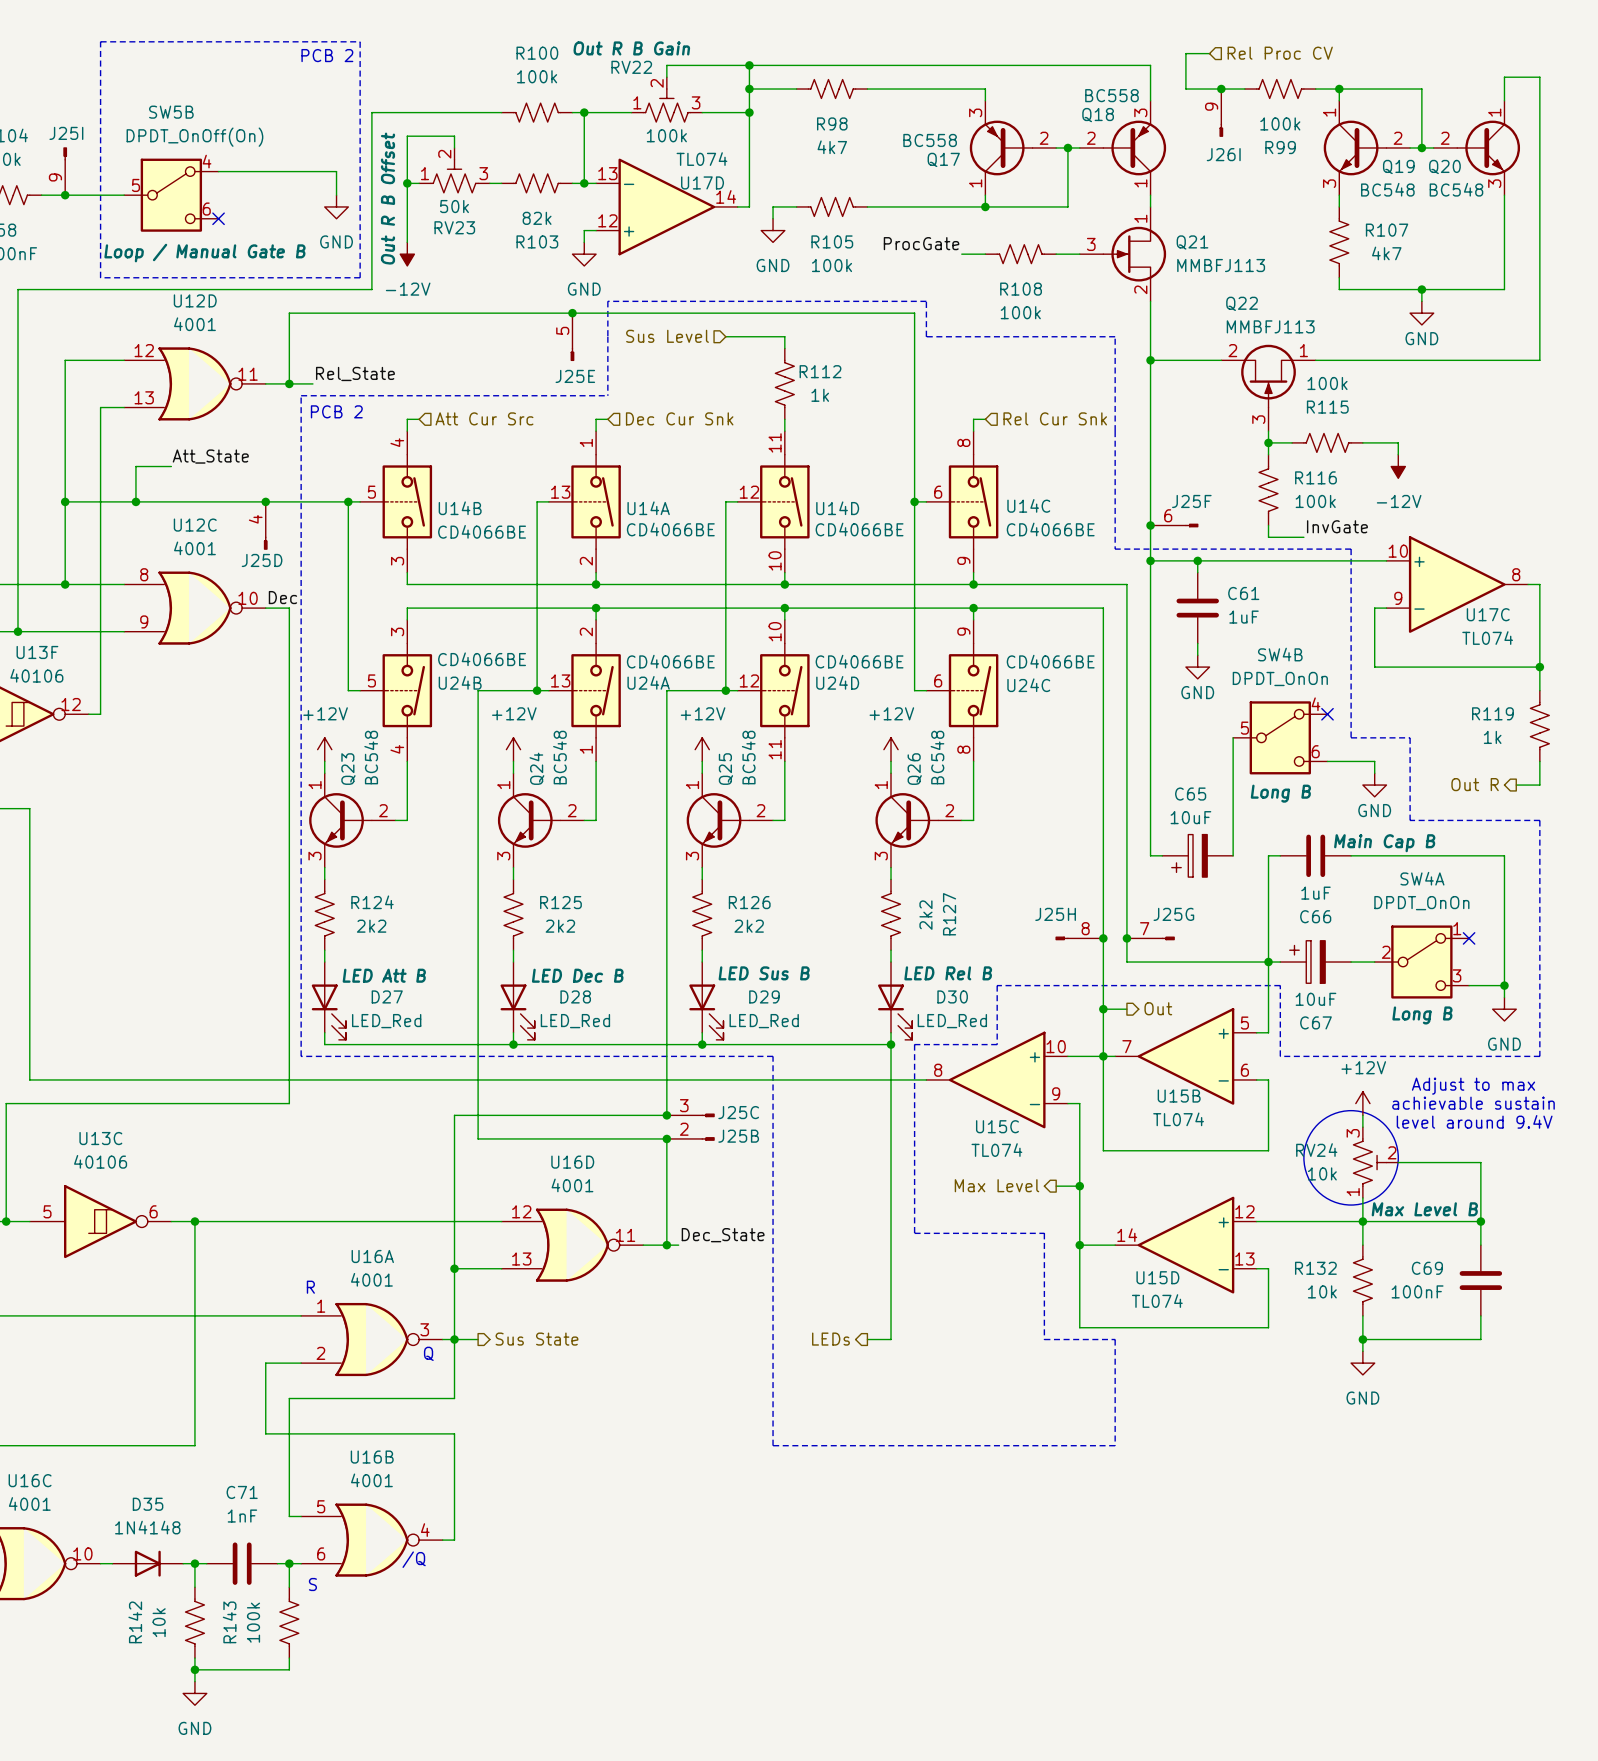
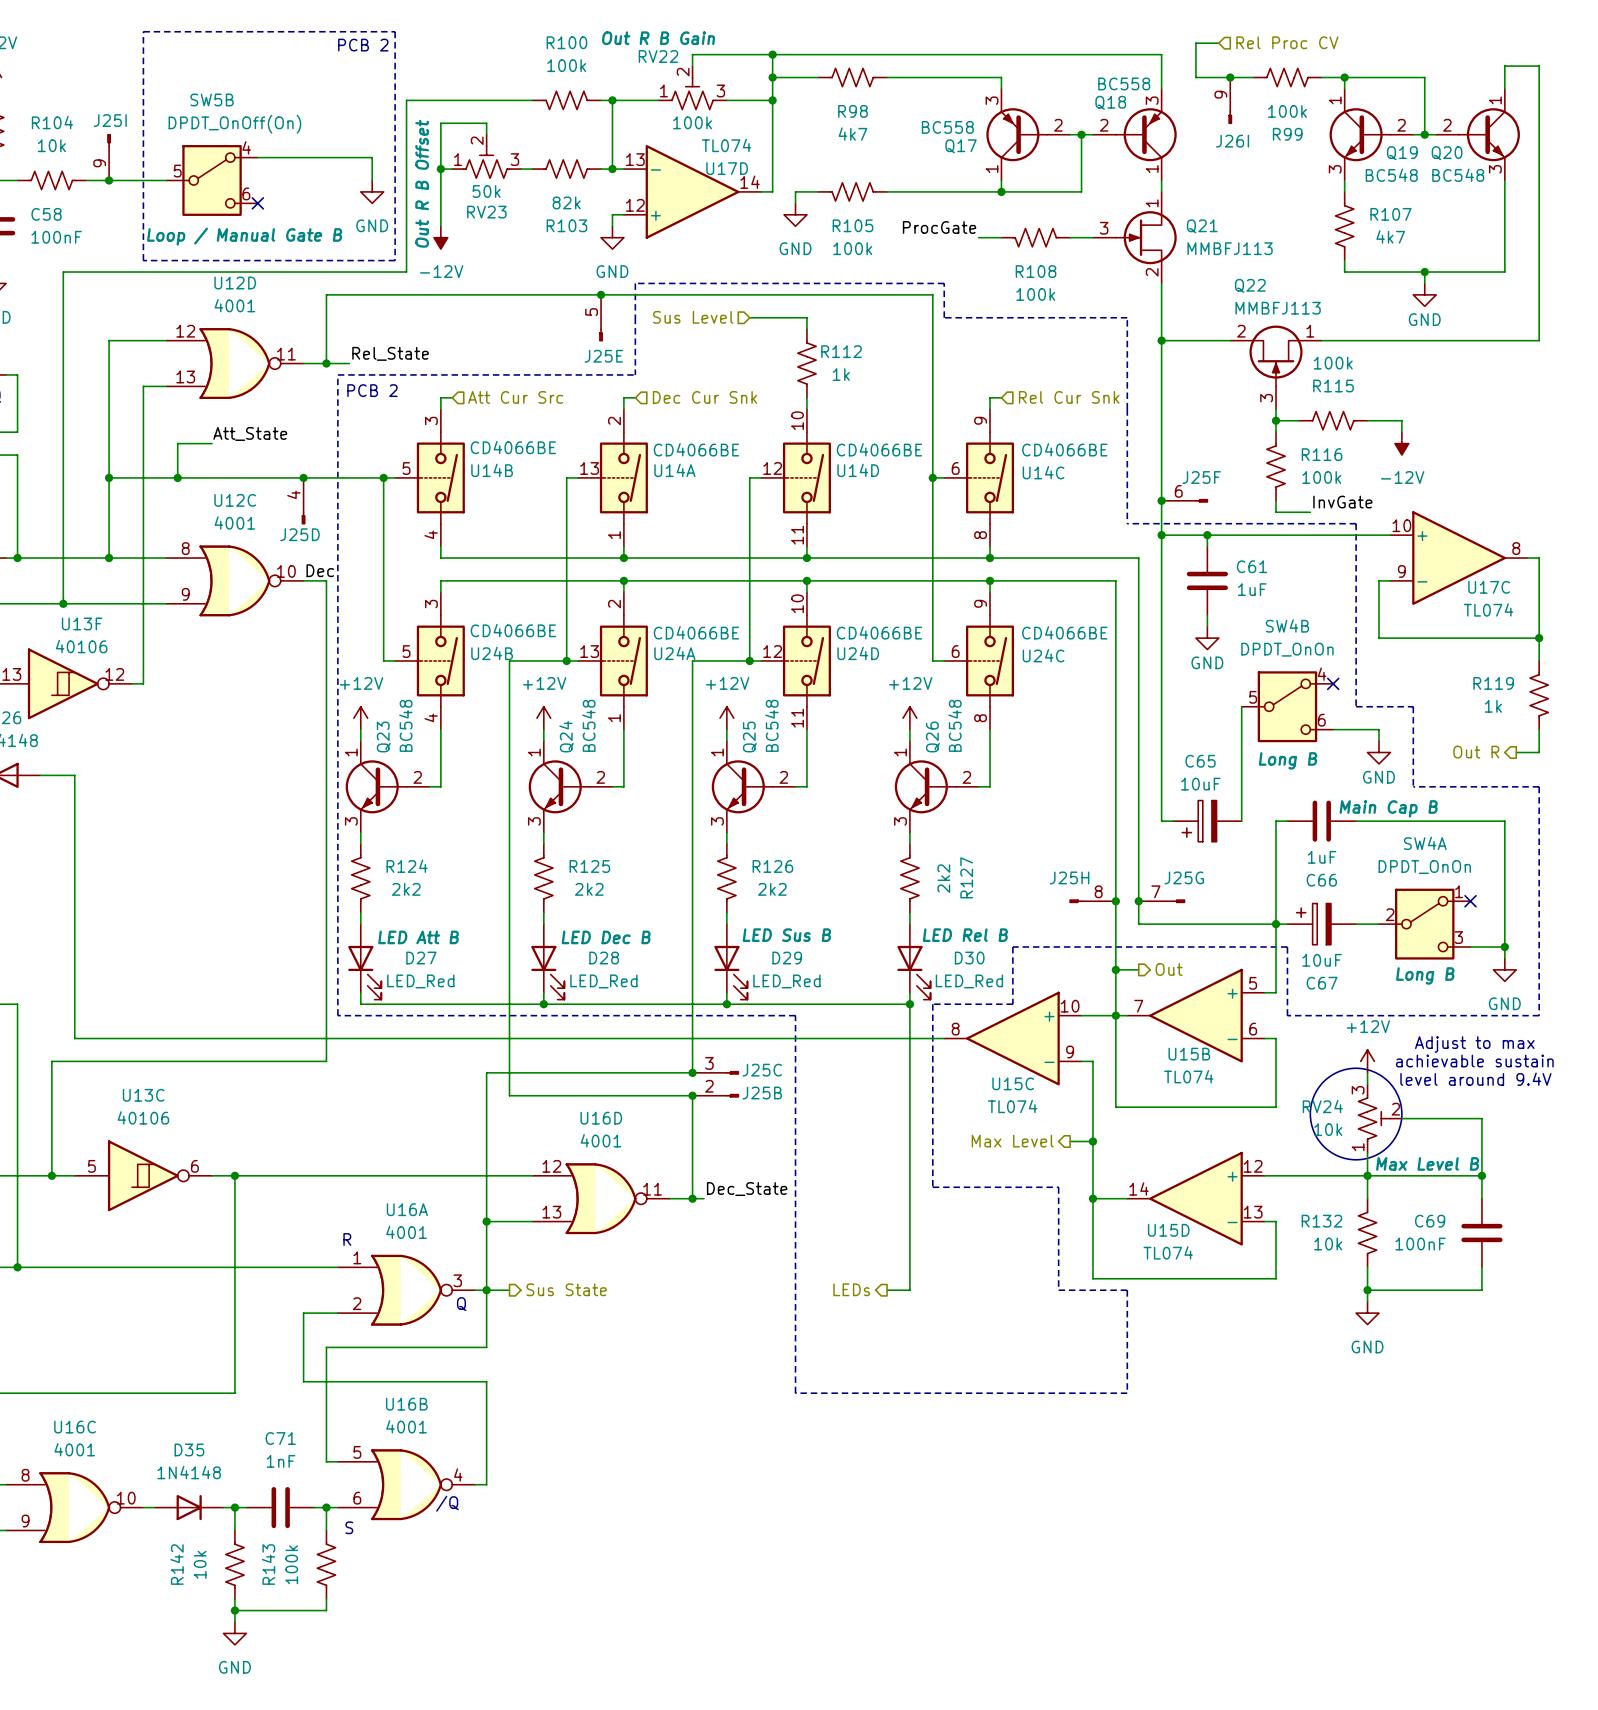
U14B flip: as is (407, 501) -> up-down (440, 477)
U14A flip: as is (596, 501) -> up-down (623, 477)
U14D flip: as is (784, 501) -> up-down (806, 477)
U14C flip: as is (973, 501) -> up-down (990, 477)

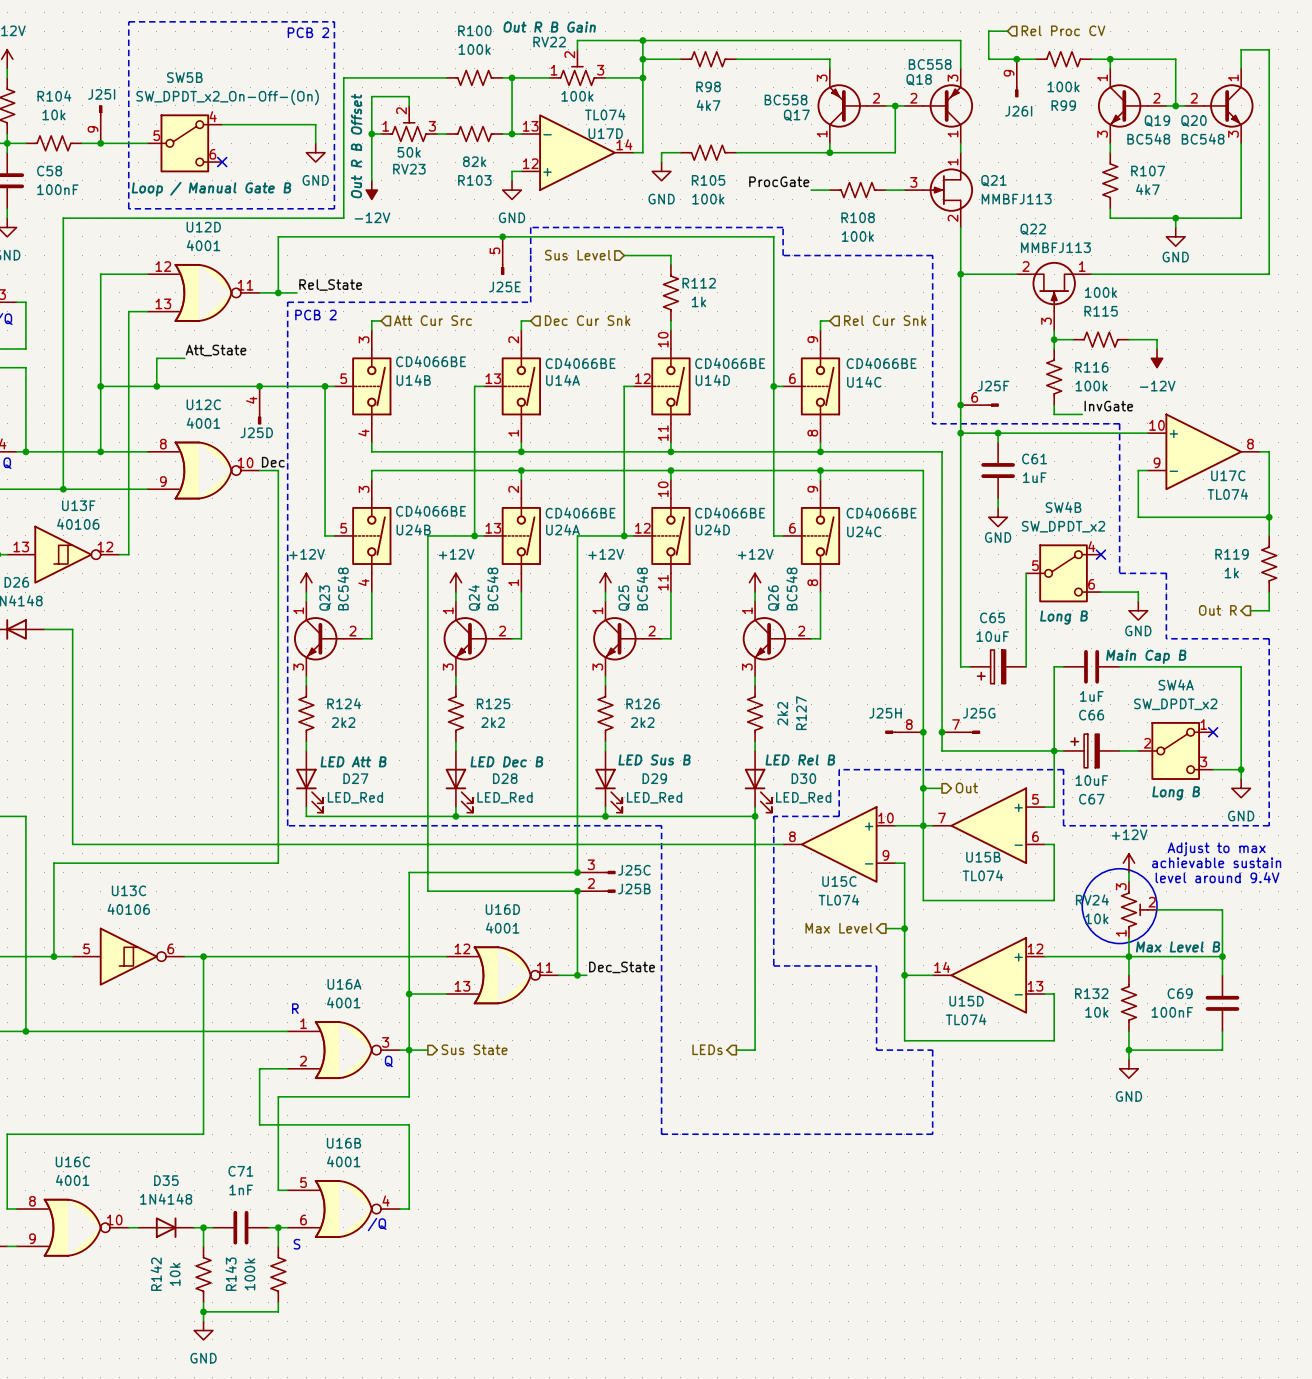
SW5B value: DPDT_OnOff(On) (234, 124) -> SW_DPDT_x2_On-Off-(On) (227, 97)
SW4B value: DPDT_OnOn (1287, 649) -> SW_DPDT_x2 (1063, 526)
SW4A value: DPDT_OnOn (1424, 867) -> SW_DPDT_x2 (1175, 704)

